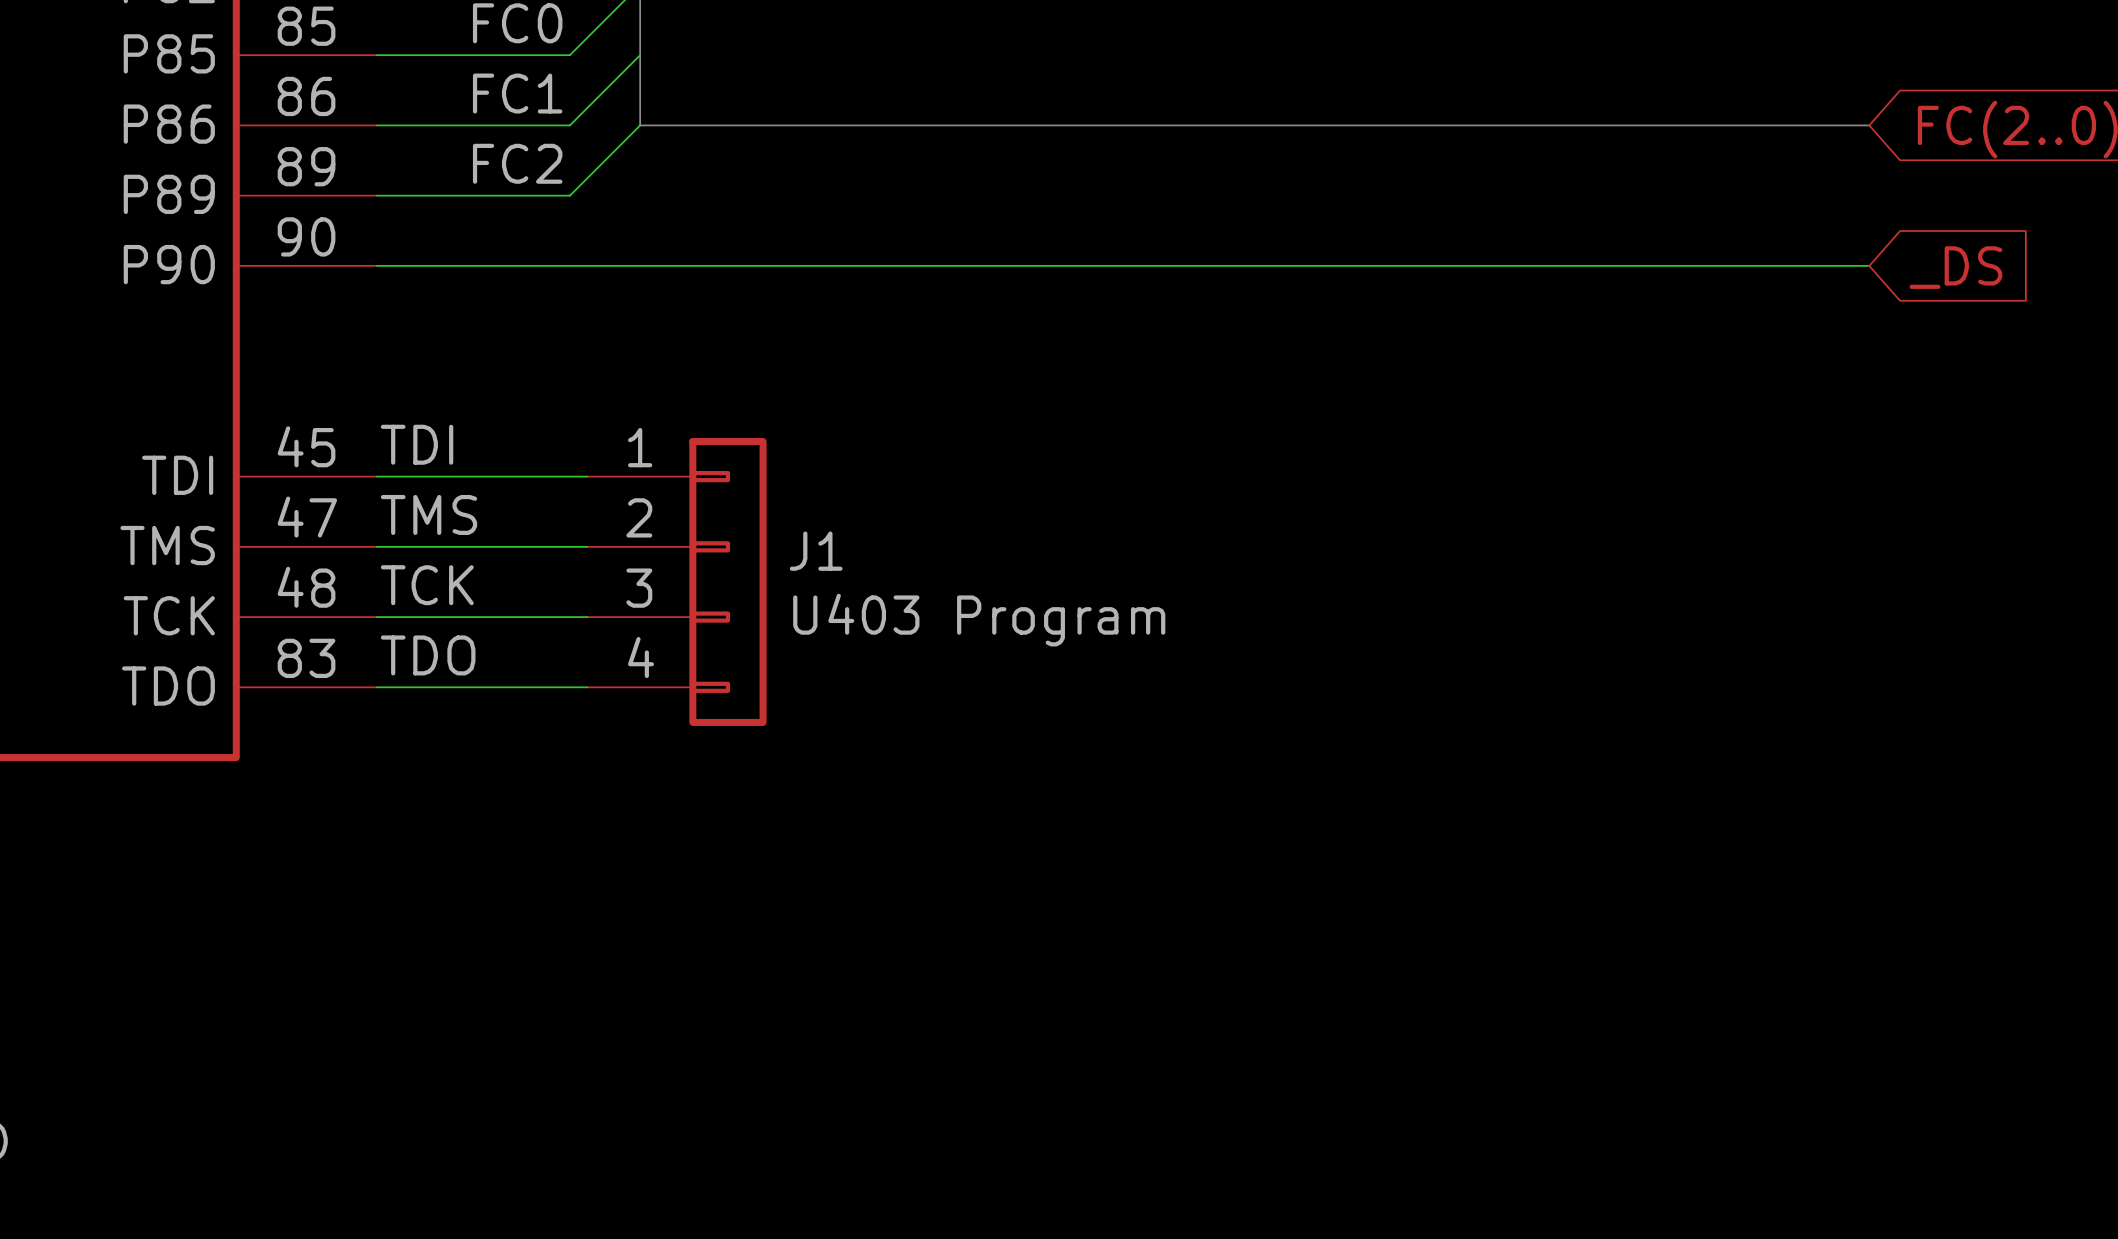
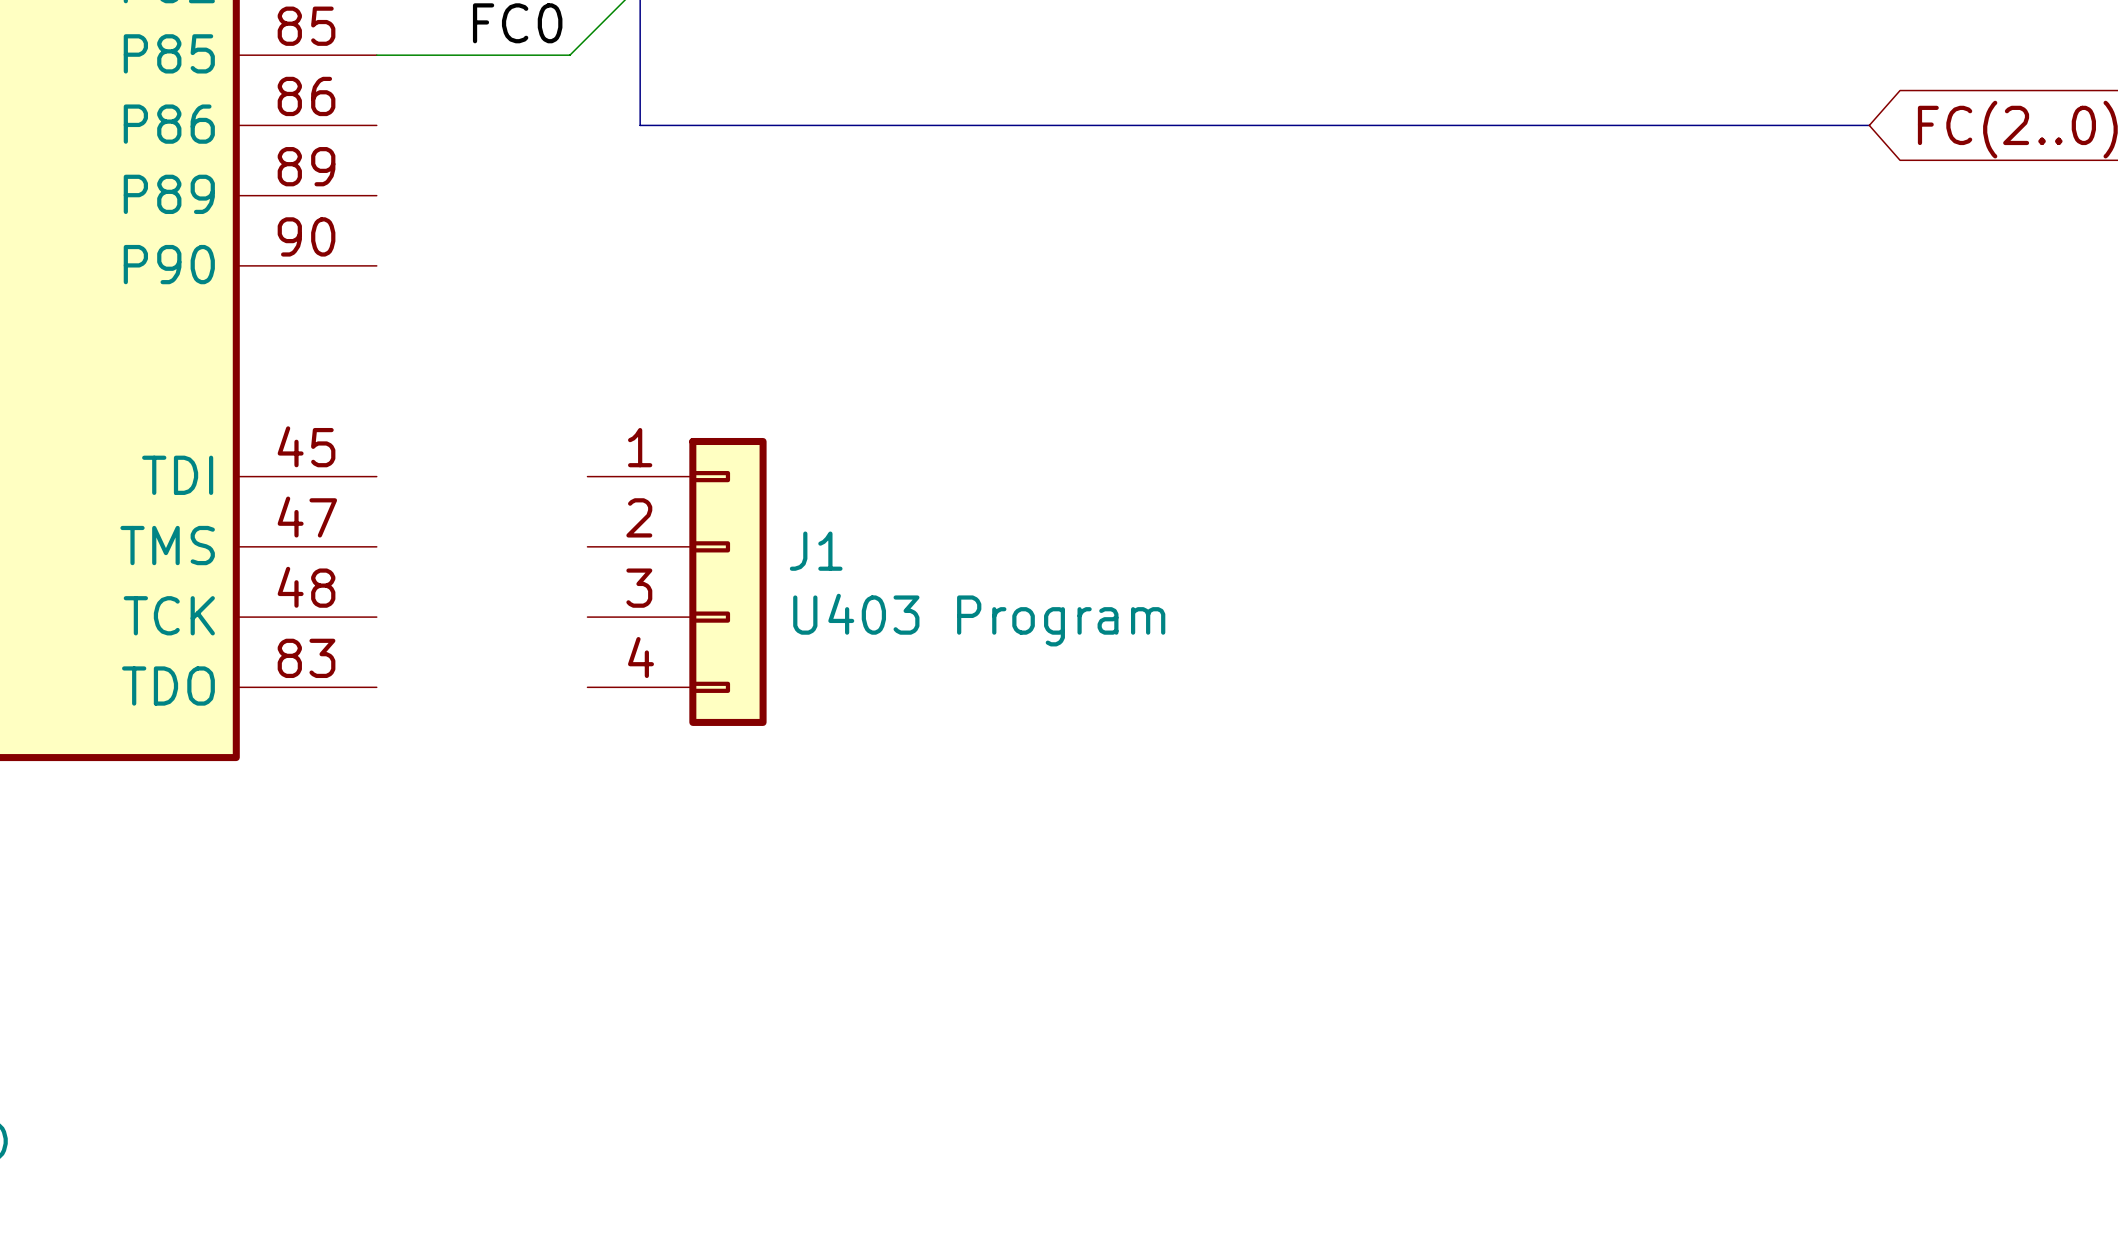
wire: (640, 55) (569, 125) (376, 125) -> none
label: FC1 (517, 93) -> none
wire: (640, 125) (569, 195) (376, 195) -> none
label: FC2 (517, 163) -> none
wire: (376, 265) (1869, 265) -> none
global label: _DS (1955, 267) -> none
label: TDI (417, 444) -> none
wire: (376, 476) (587, 476) -> none
label: TMS (429, 514) -> none
wire: (376, 546) (587, 546) -> none
label: TCK (427, 585) -> none
wire: (376, 617) (587, 617) -> none
label: TDO (428, 655) -> none
wire: (376, 687) (587, 687) -> none

